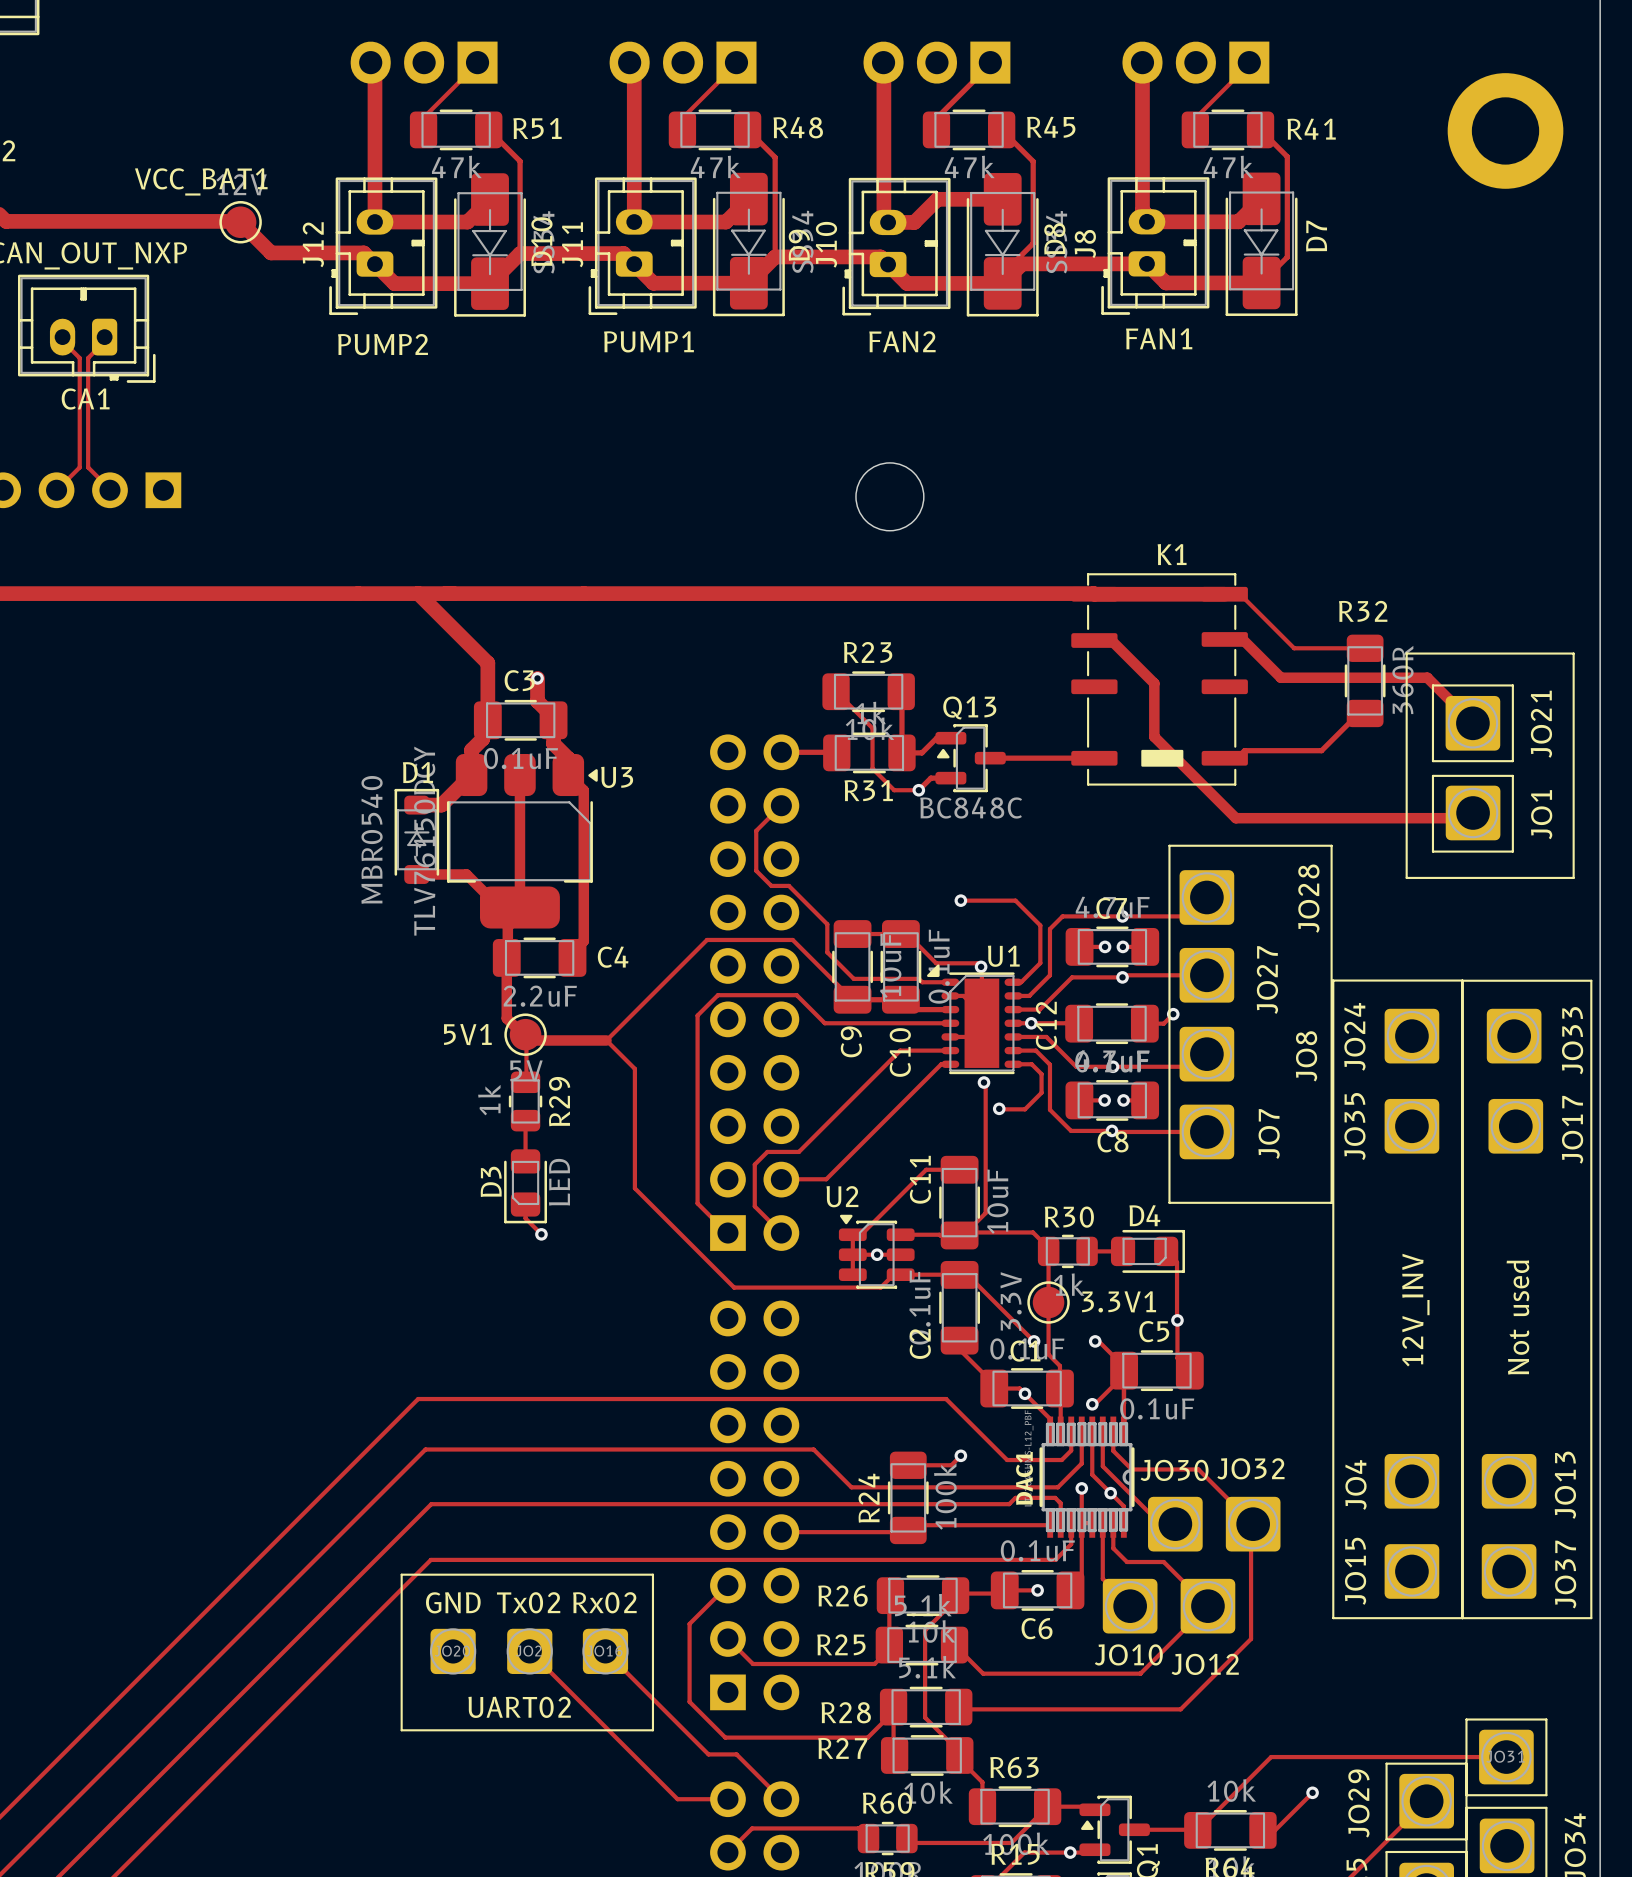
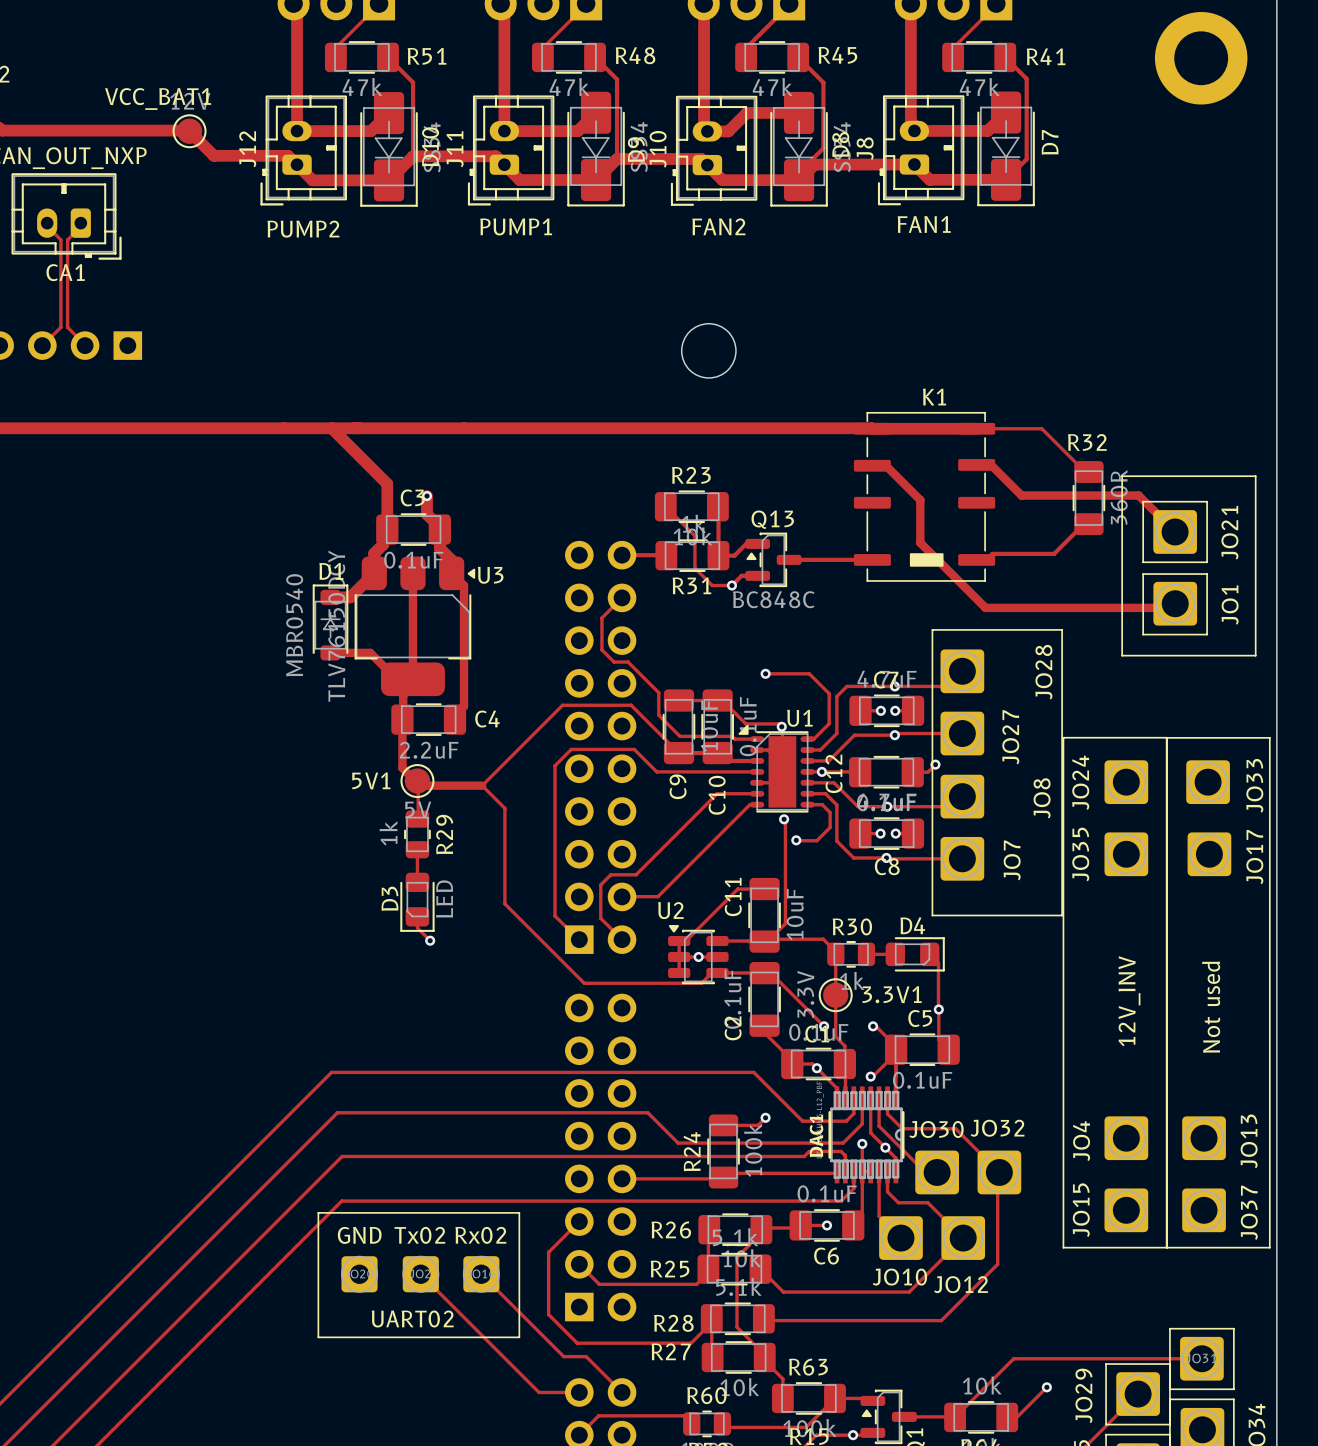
track: (1240, 594) (1294, 648) (1358, 648) -> (988, 428) (1041, 428) (1085, 471)

